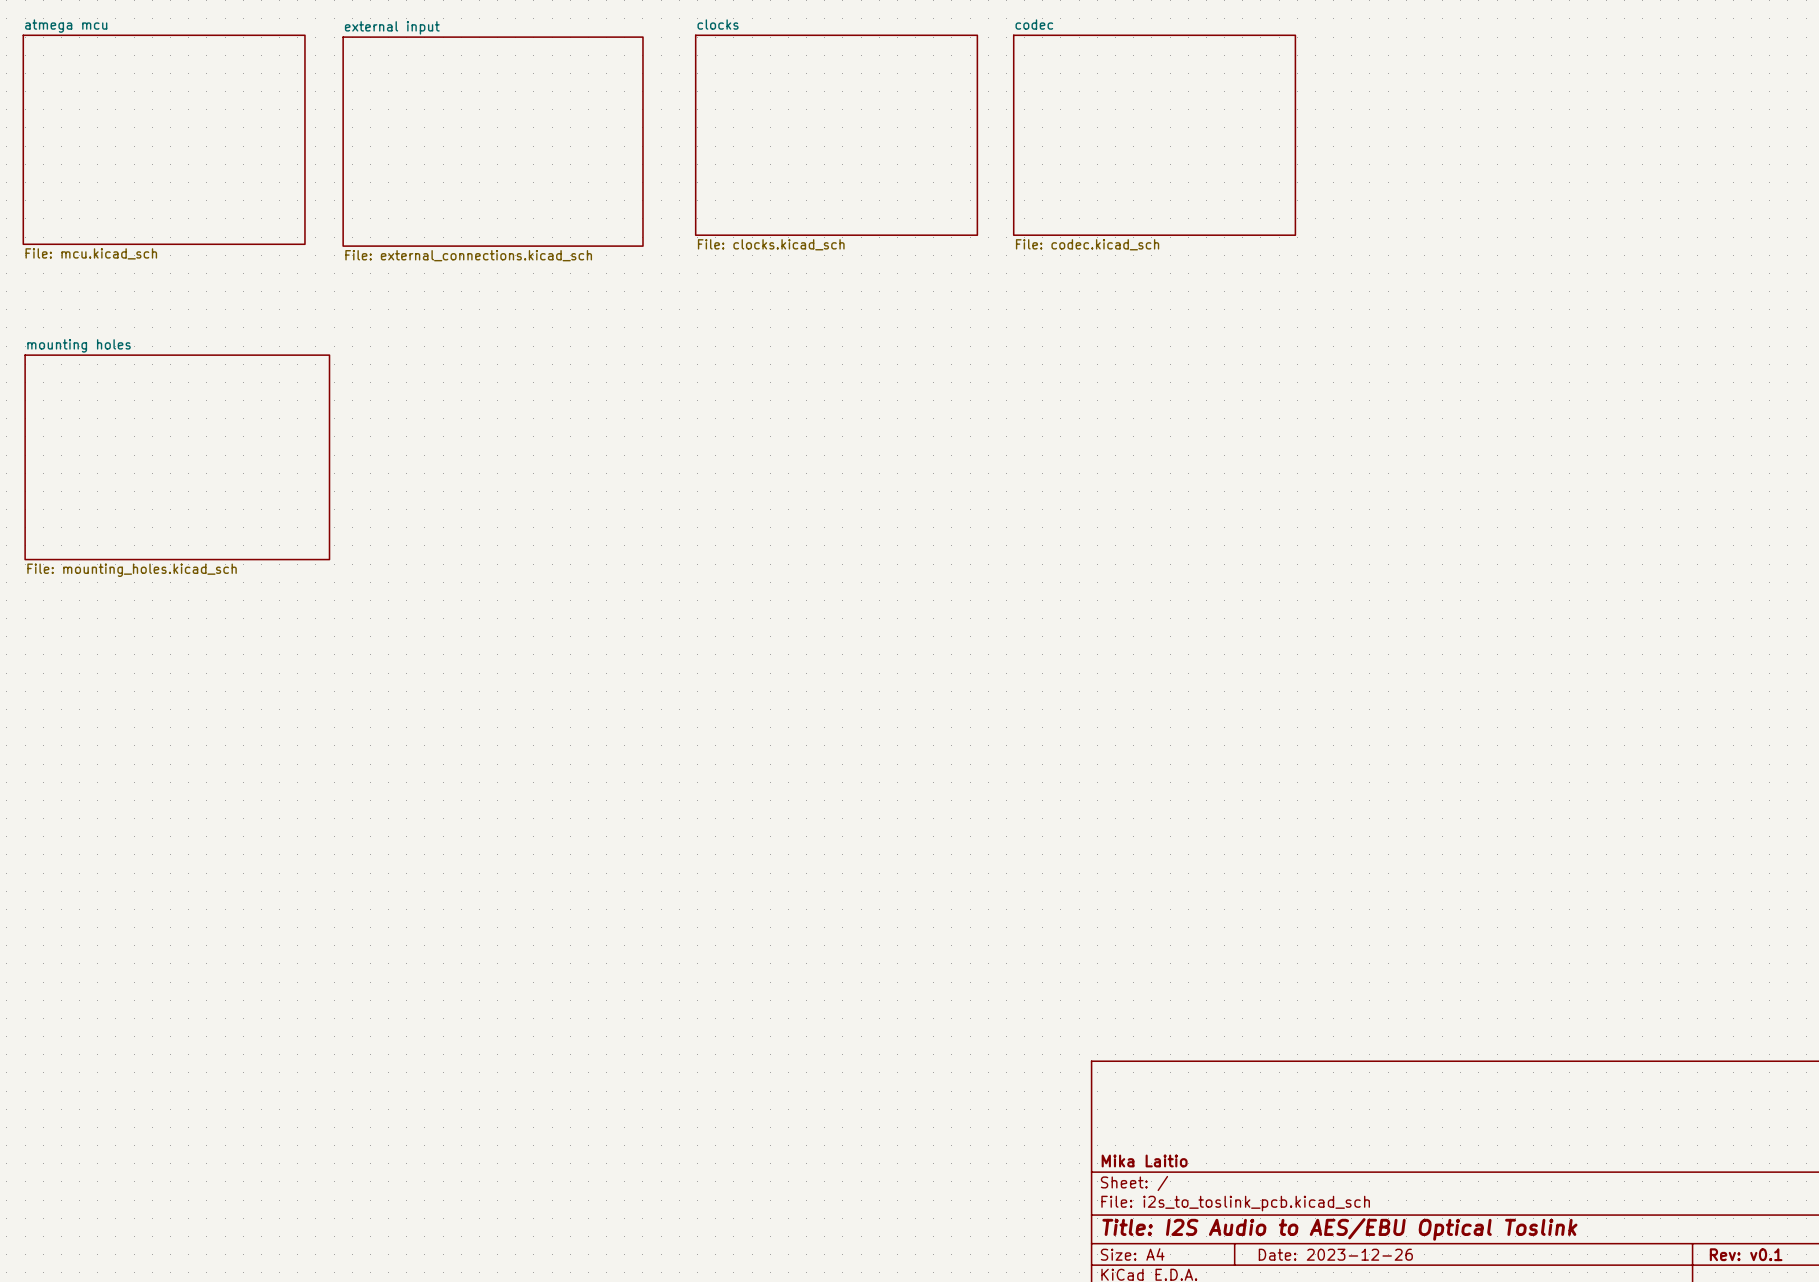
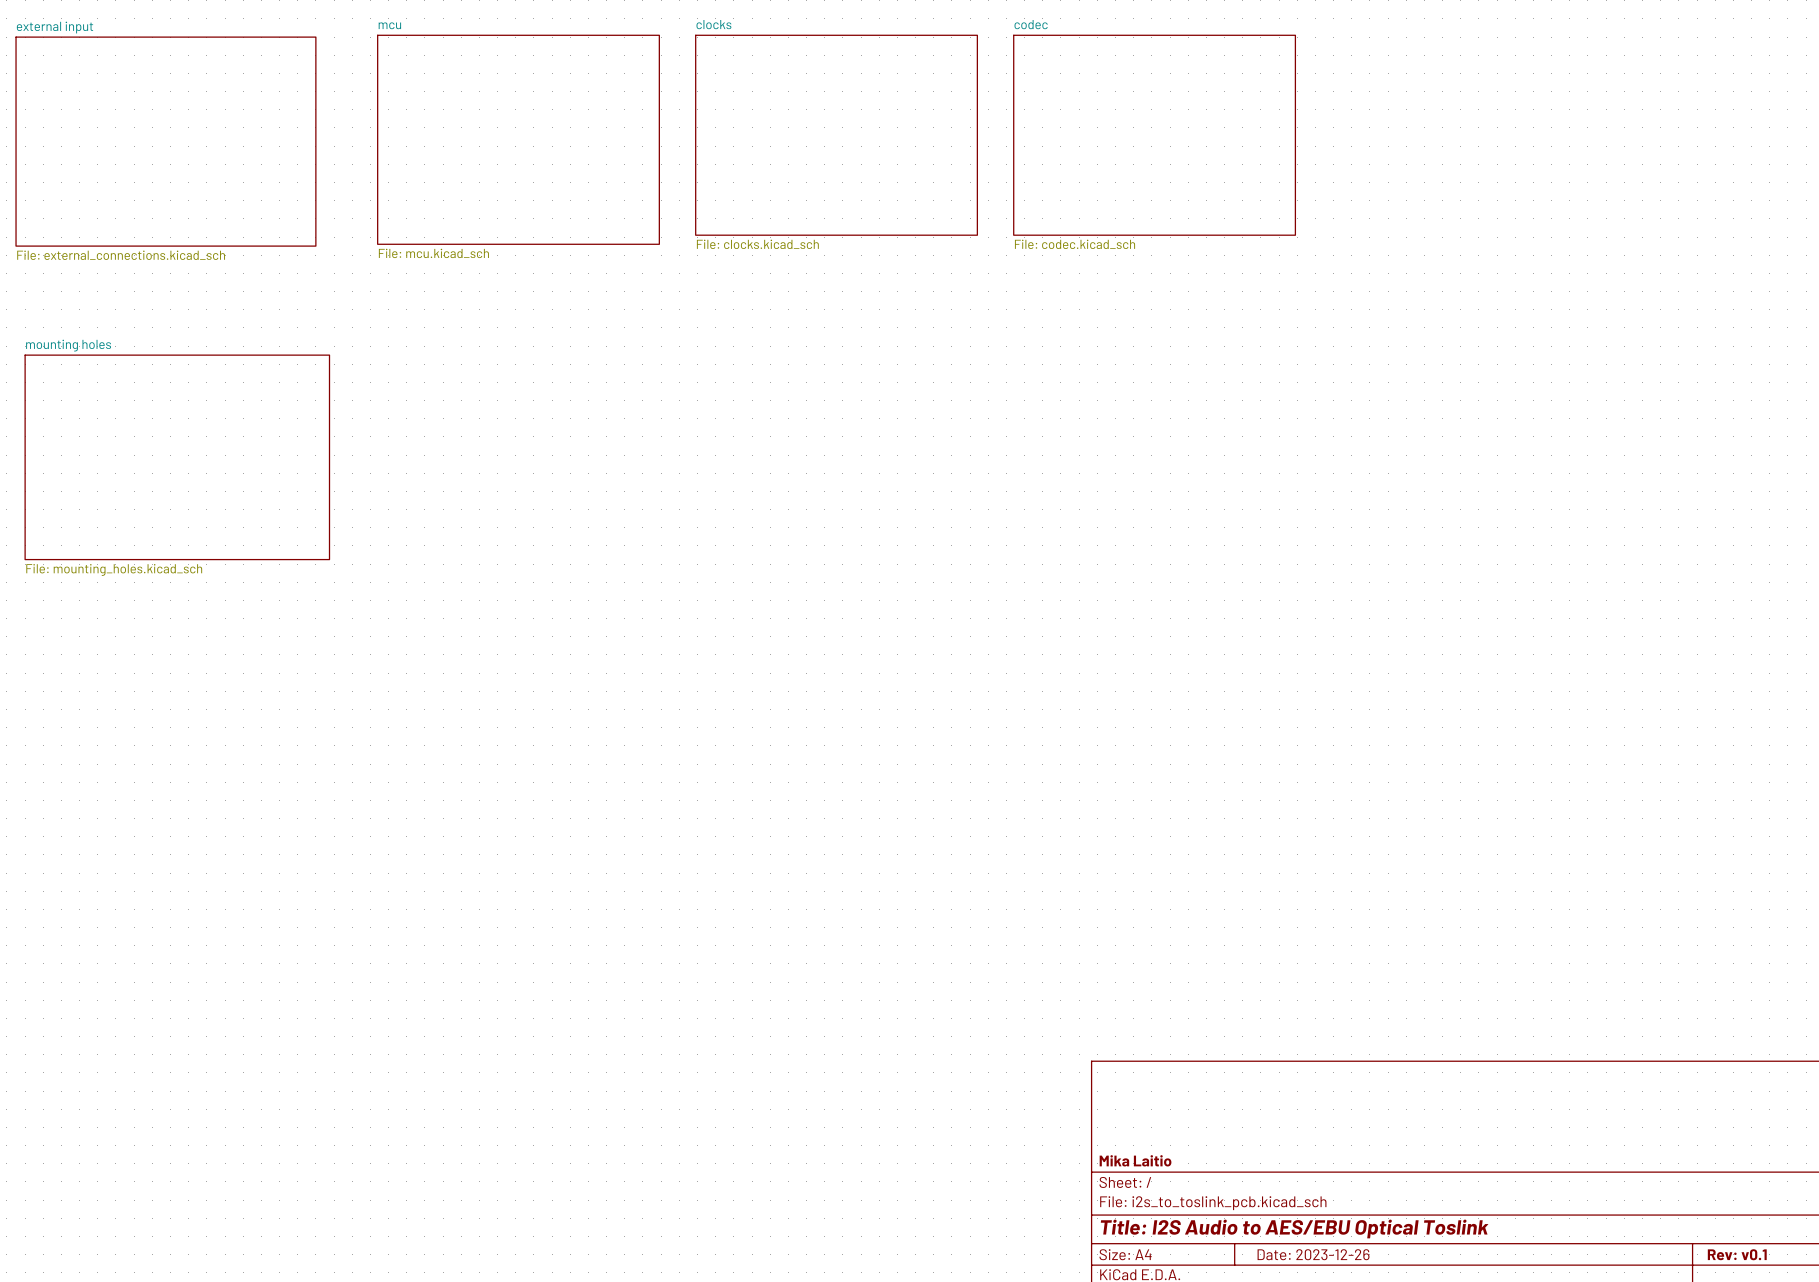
sheet atmega mcu: File: mcu.kicad_sch (164, 139) -> none
sheet mcu: none -> File: mcu.kicad_sch (518, 139)
sheet external input: none -> File: external_connections.kicad_sch (165, 141)
sheet external input: File: external_connections.kicad_sch (493, 141) -> none

